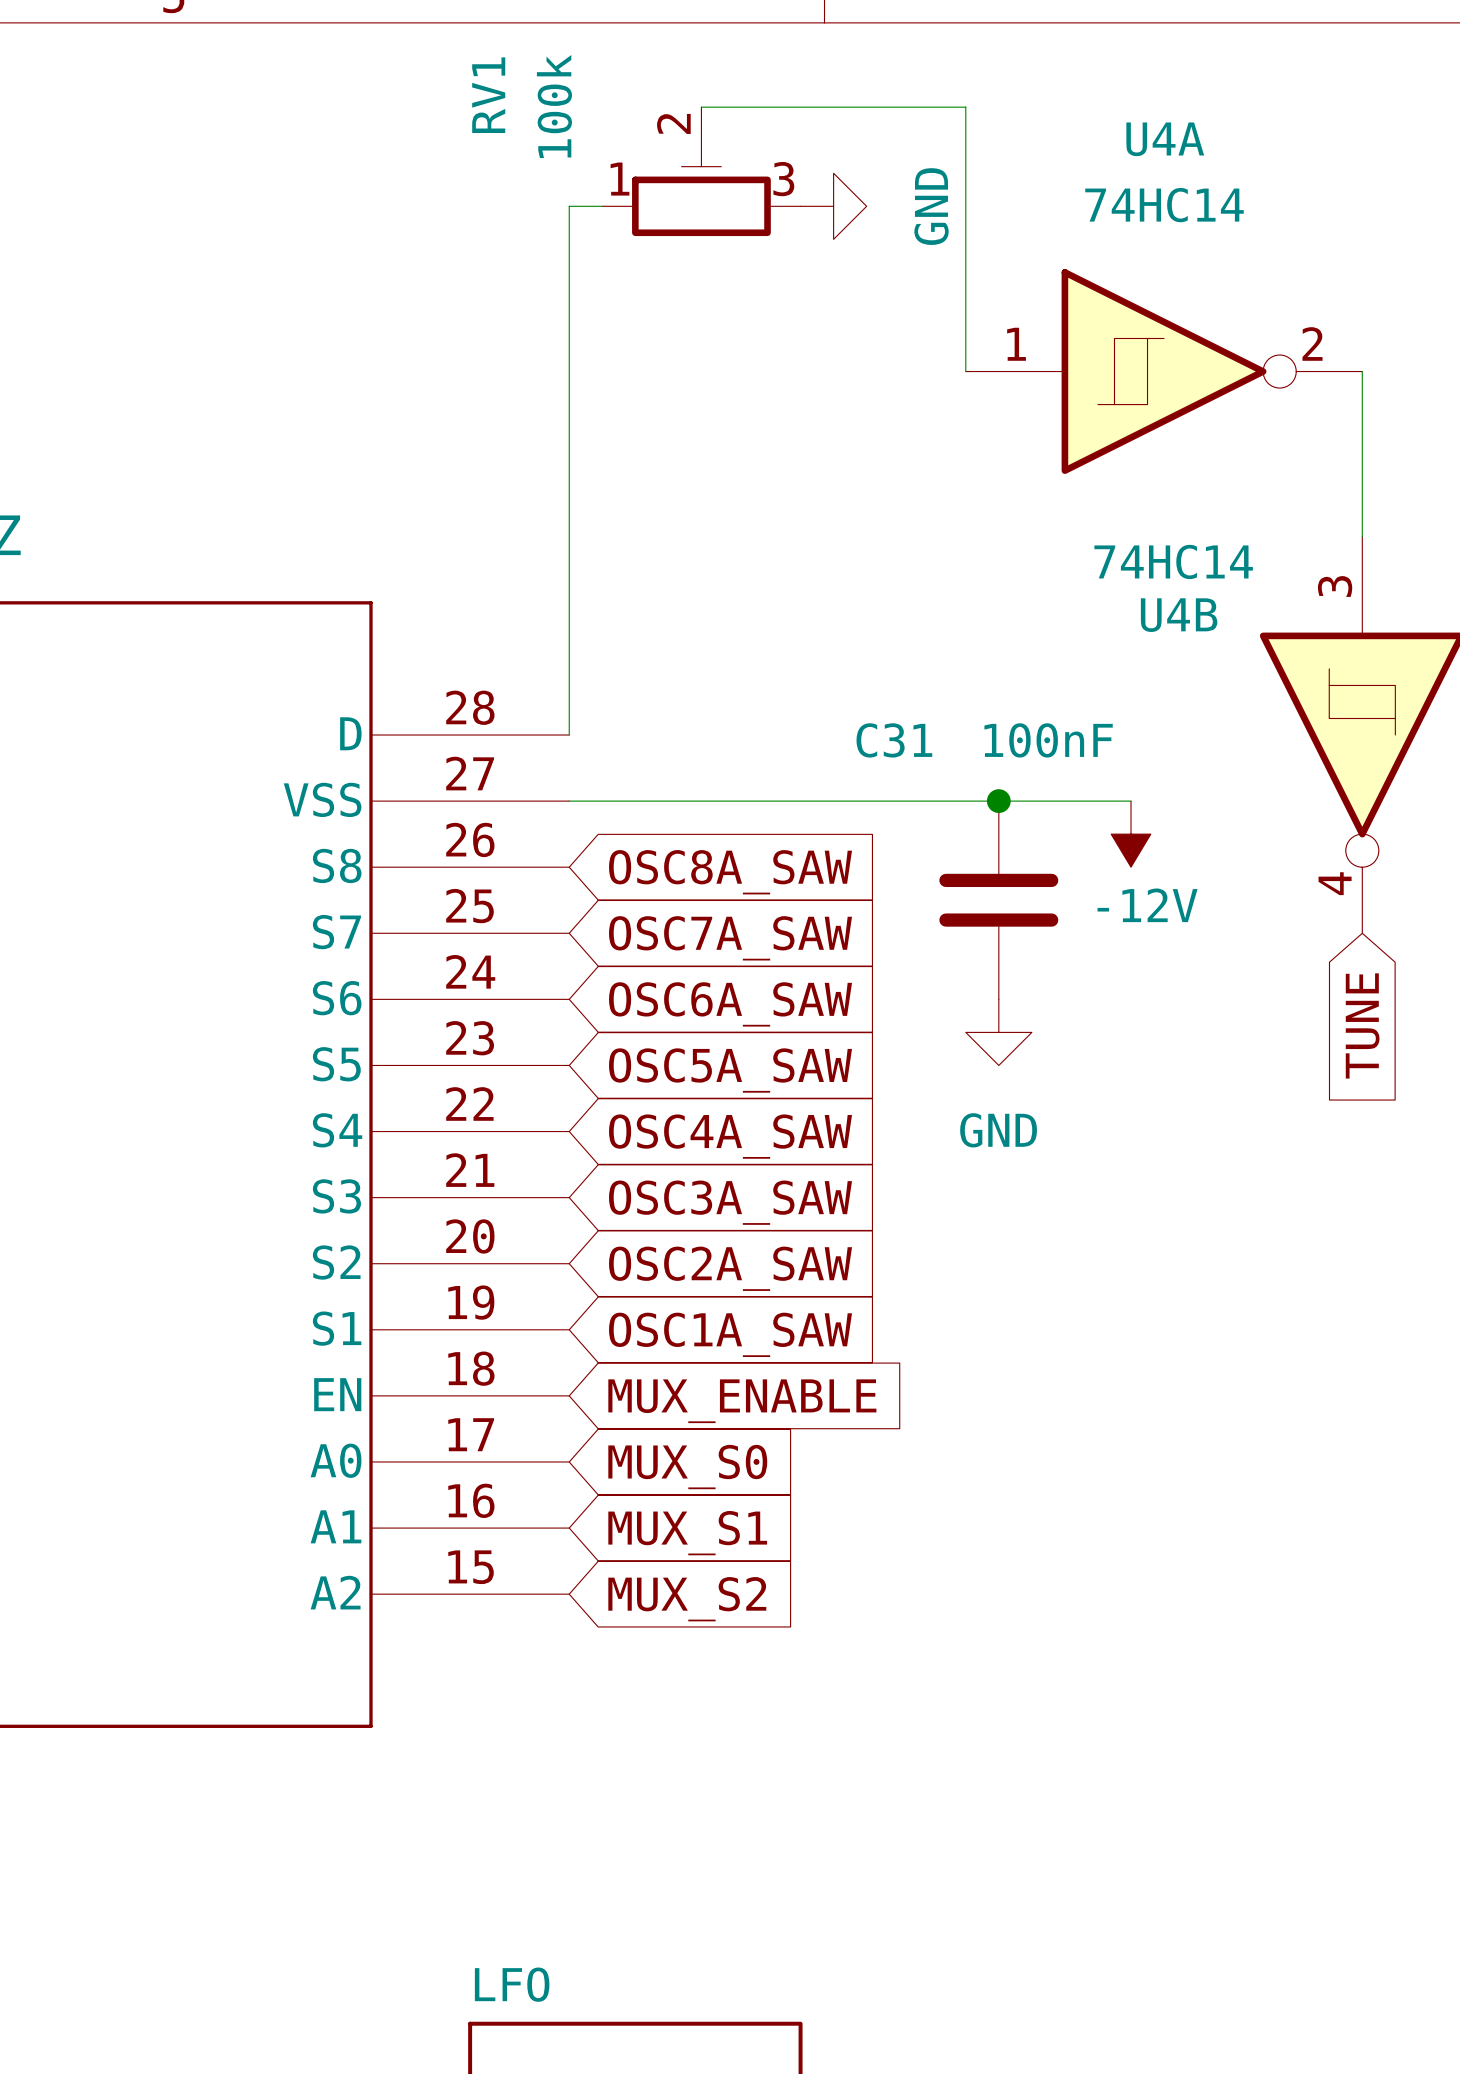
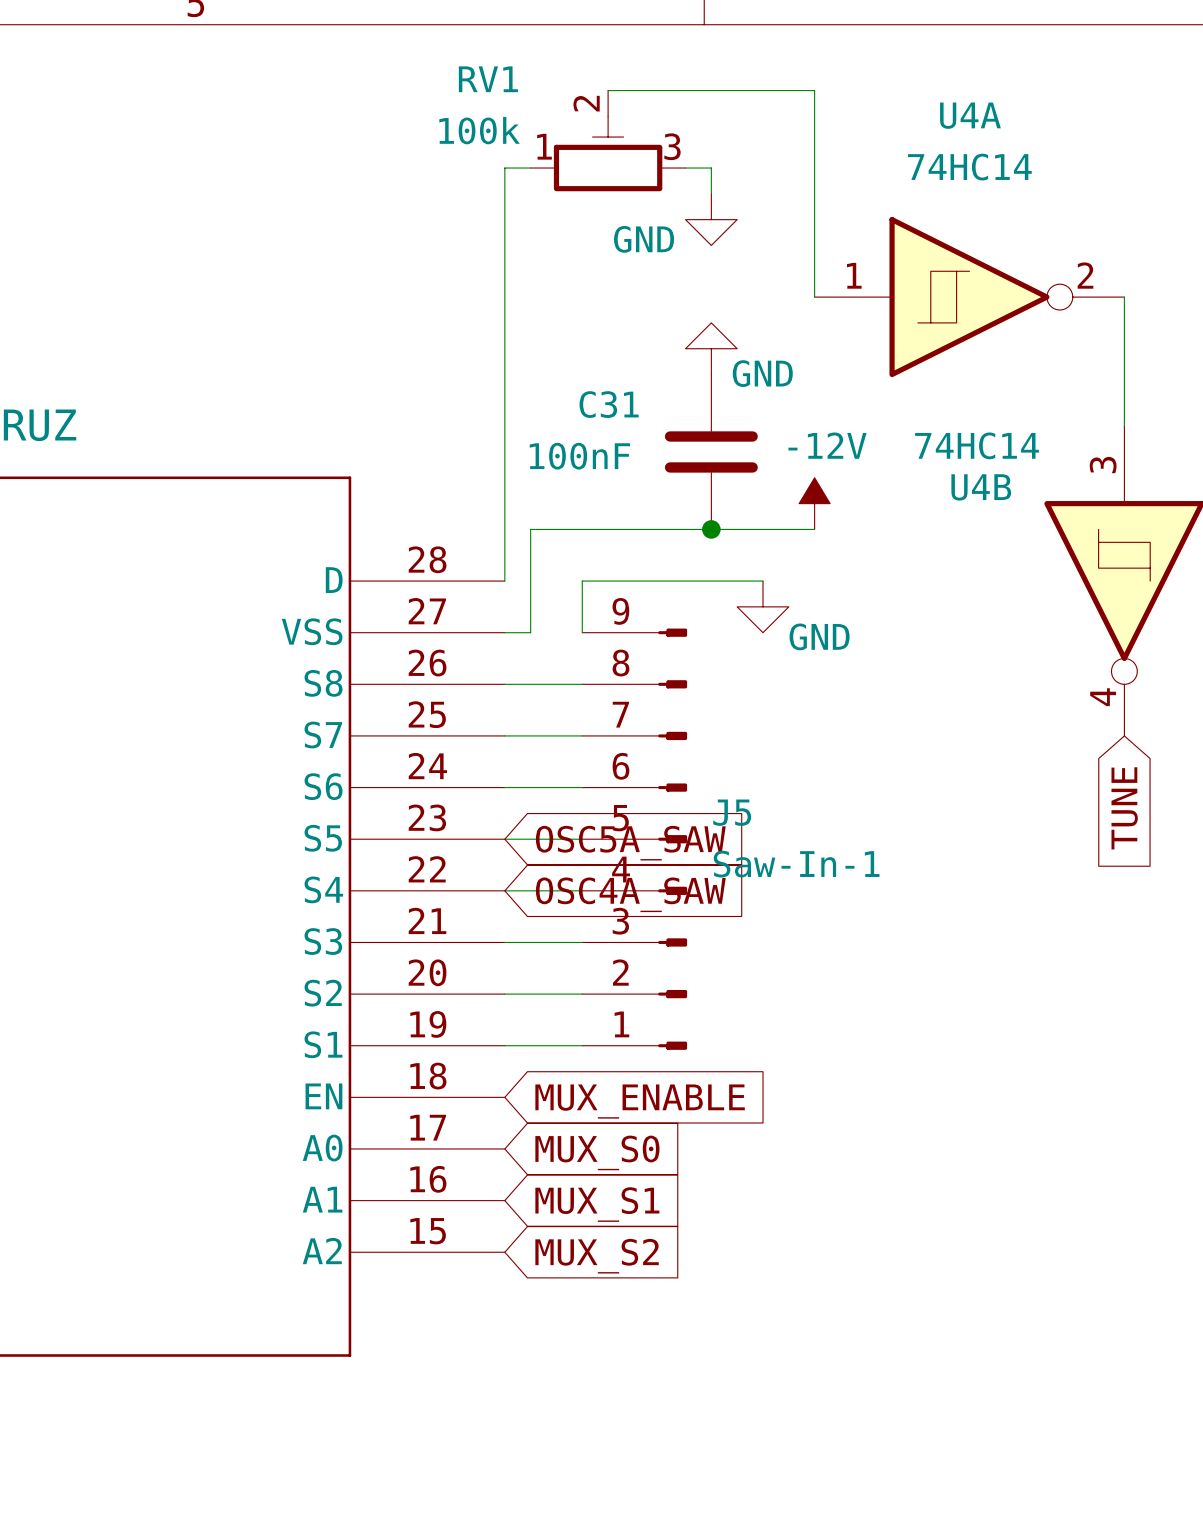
RV1 name rotation: 0° (488, 95) -> 90° clockwise (488, 79)
RV1 value rotation: 0° (554, 106) -> 90° clockwise (479, 130)
power symbol rotation: 0° (833, 206) -> 90° clockwise (711, 219)
power symbol position: GND (833, 206) -> GND (711, 219)
power symbol text position: GND (931, 206) -> GND (644, 239)
power symbol: none -> GND (711, 348)
junction: none -> (711, 529)
wire: none -> (762, 581) (582, 581) (582, 632)
C31 name position: C31 (894, 740) -> C31 (609, 404)
C31 value position: 100nF (1048, 740) -> 100nF (579, 456)
wire: (602, 801) (1131, 801) -> (530, 632) (530, 529) (814, 529)
junction: (998, 801) -> none
power symbol rotation: 0° (1131, 834) -> 180° (814, 503)
power symbol position: -12V (1131, 834) -> -12V (814, 503)
wire: none -> (504, 684) (582, 684)
global label: OSC8A_SAW (730, 872) -> none
C31 position: (998, 900) -> (711, 451)
wire: none -> (504, 735) (582, 735)
global label: OSC7A_SAW (730, 938) -> none
wire: none -> (504, 787) (582, 787)
global label: OSC6A_SAW (730, 1004) -> none
power symbol position: GND (998, 1032) -> GND (762, 606)
wire: none -> (504, 839) (582, 839)
J5: none -> Saw-In-1 (634, 839)
power symbol text position: GND (998, 1130) -> GND (819, 636)
wire: none -> (504, 890) (582, 890)
wire: none -> (504, 942) (582, 942)
global label: OSC3A_SAW (730, 1202) -> none
wire: none -> (504, 994) (582, 994)
global label: OSC2A_SAW (730, 1268) -> none
wire: none -> (504, 1045) (582, 1045)
global label: OSC1A_SAW (730, 1334) -> none

